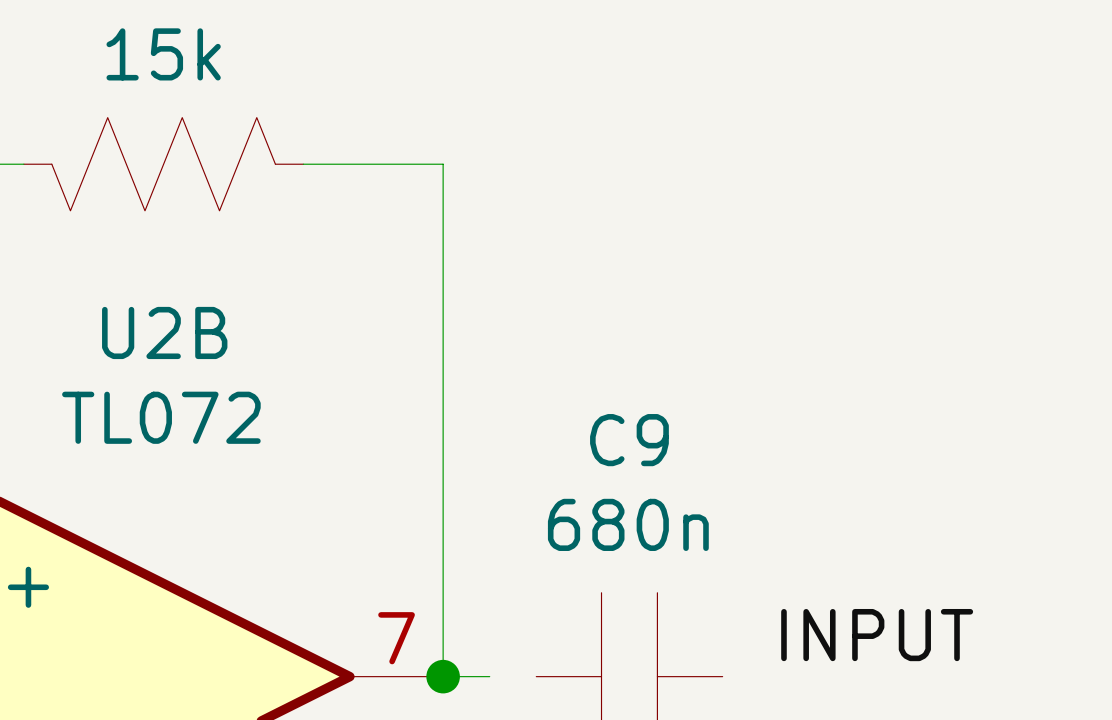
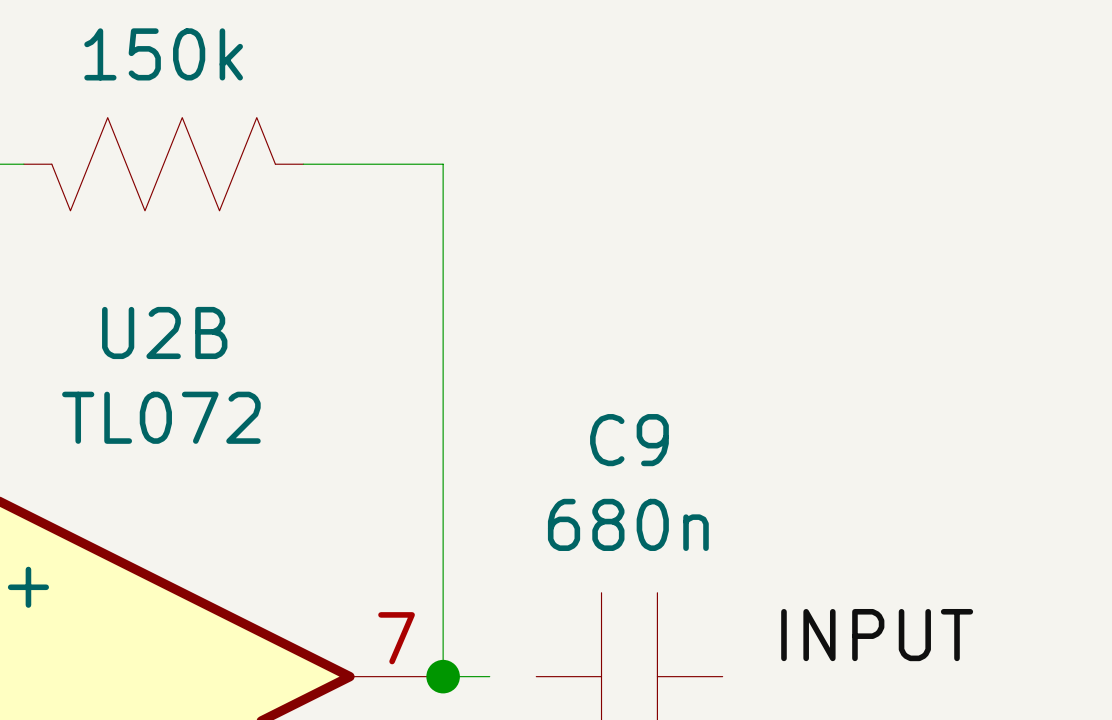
part value: 15k (163, 54) -> 150k (163, 54)

